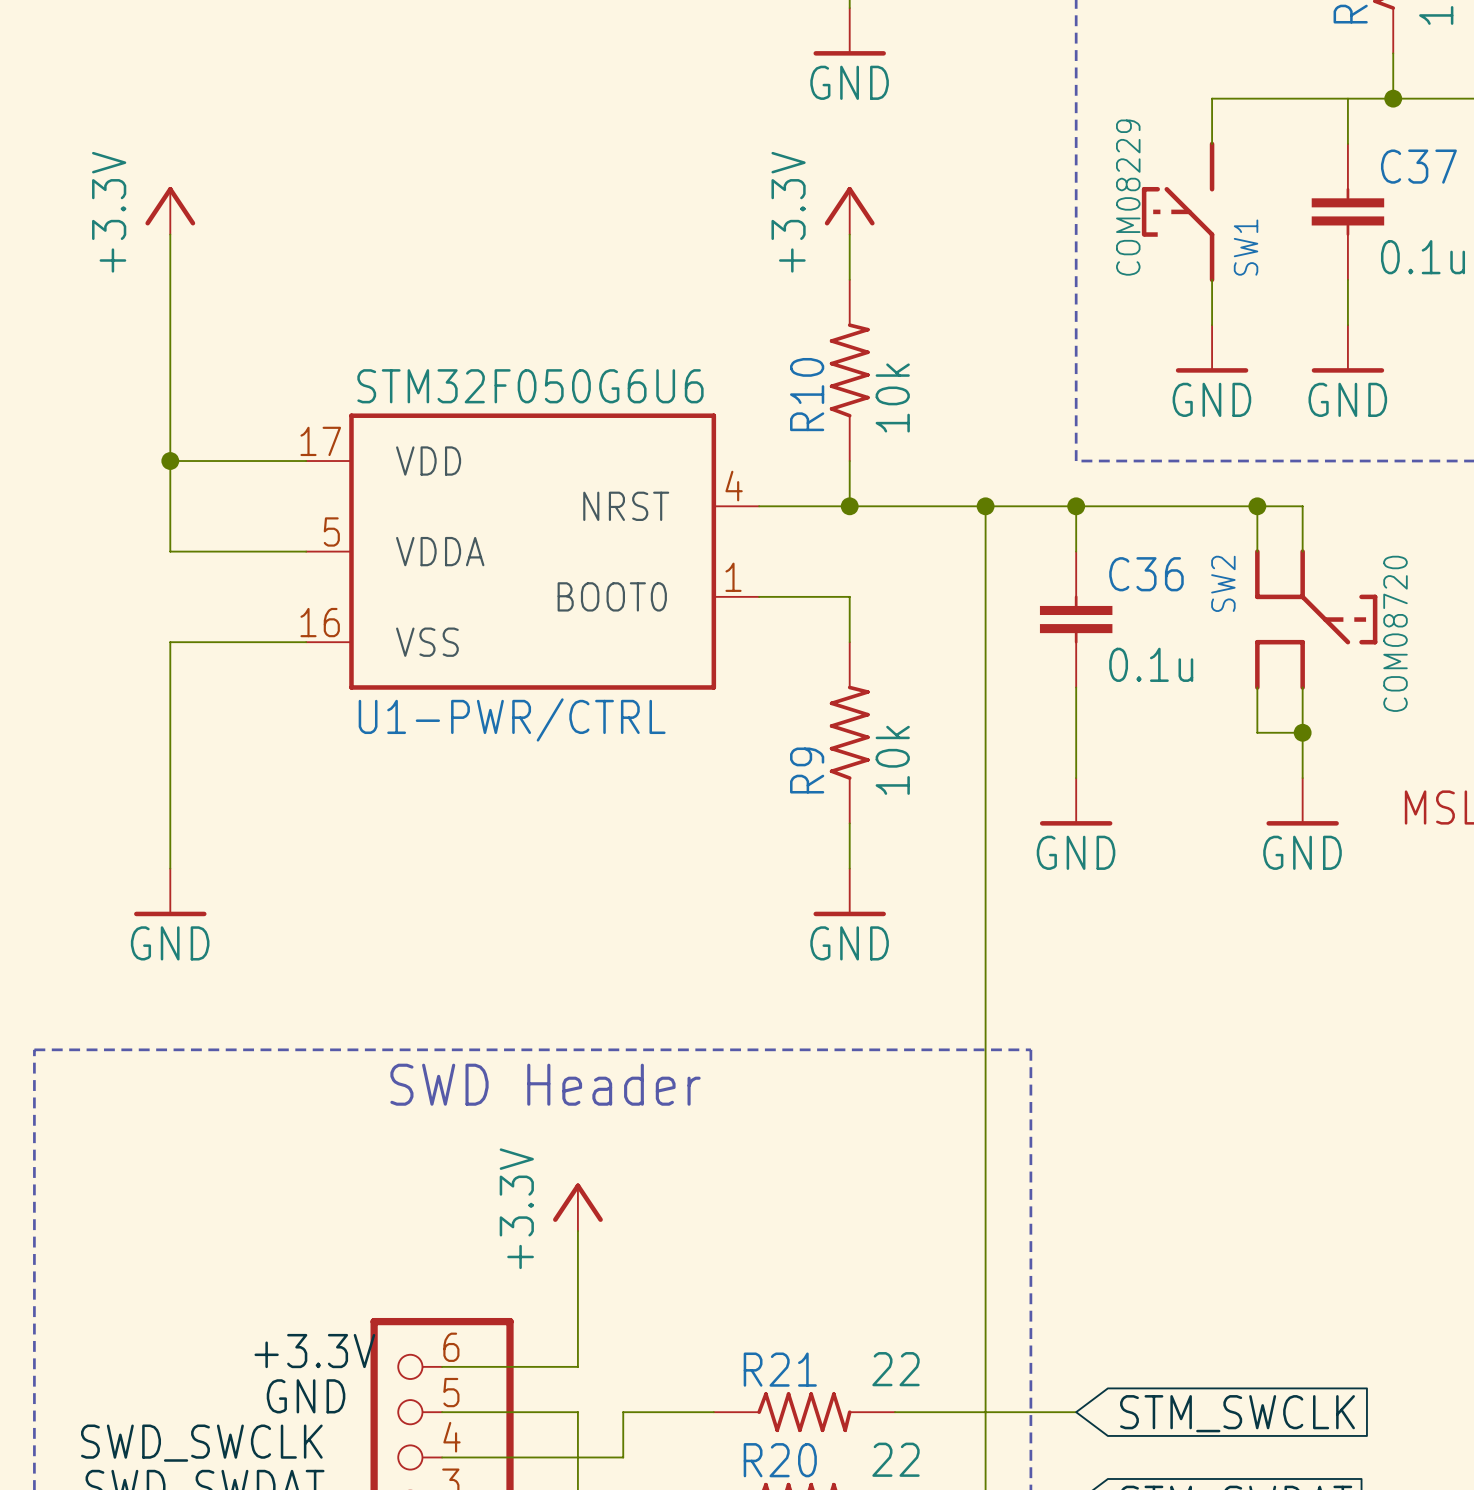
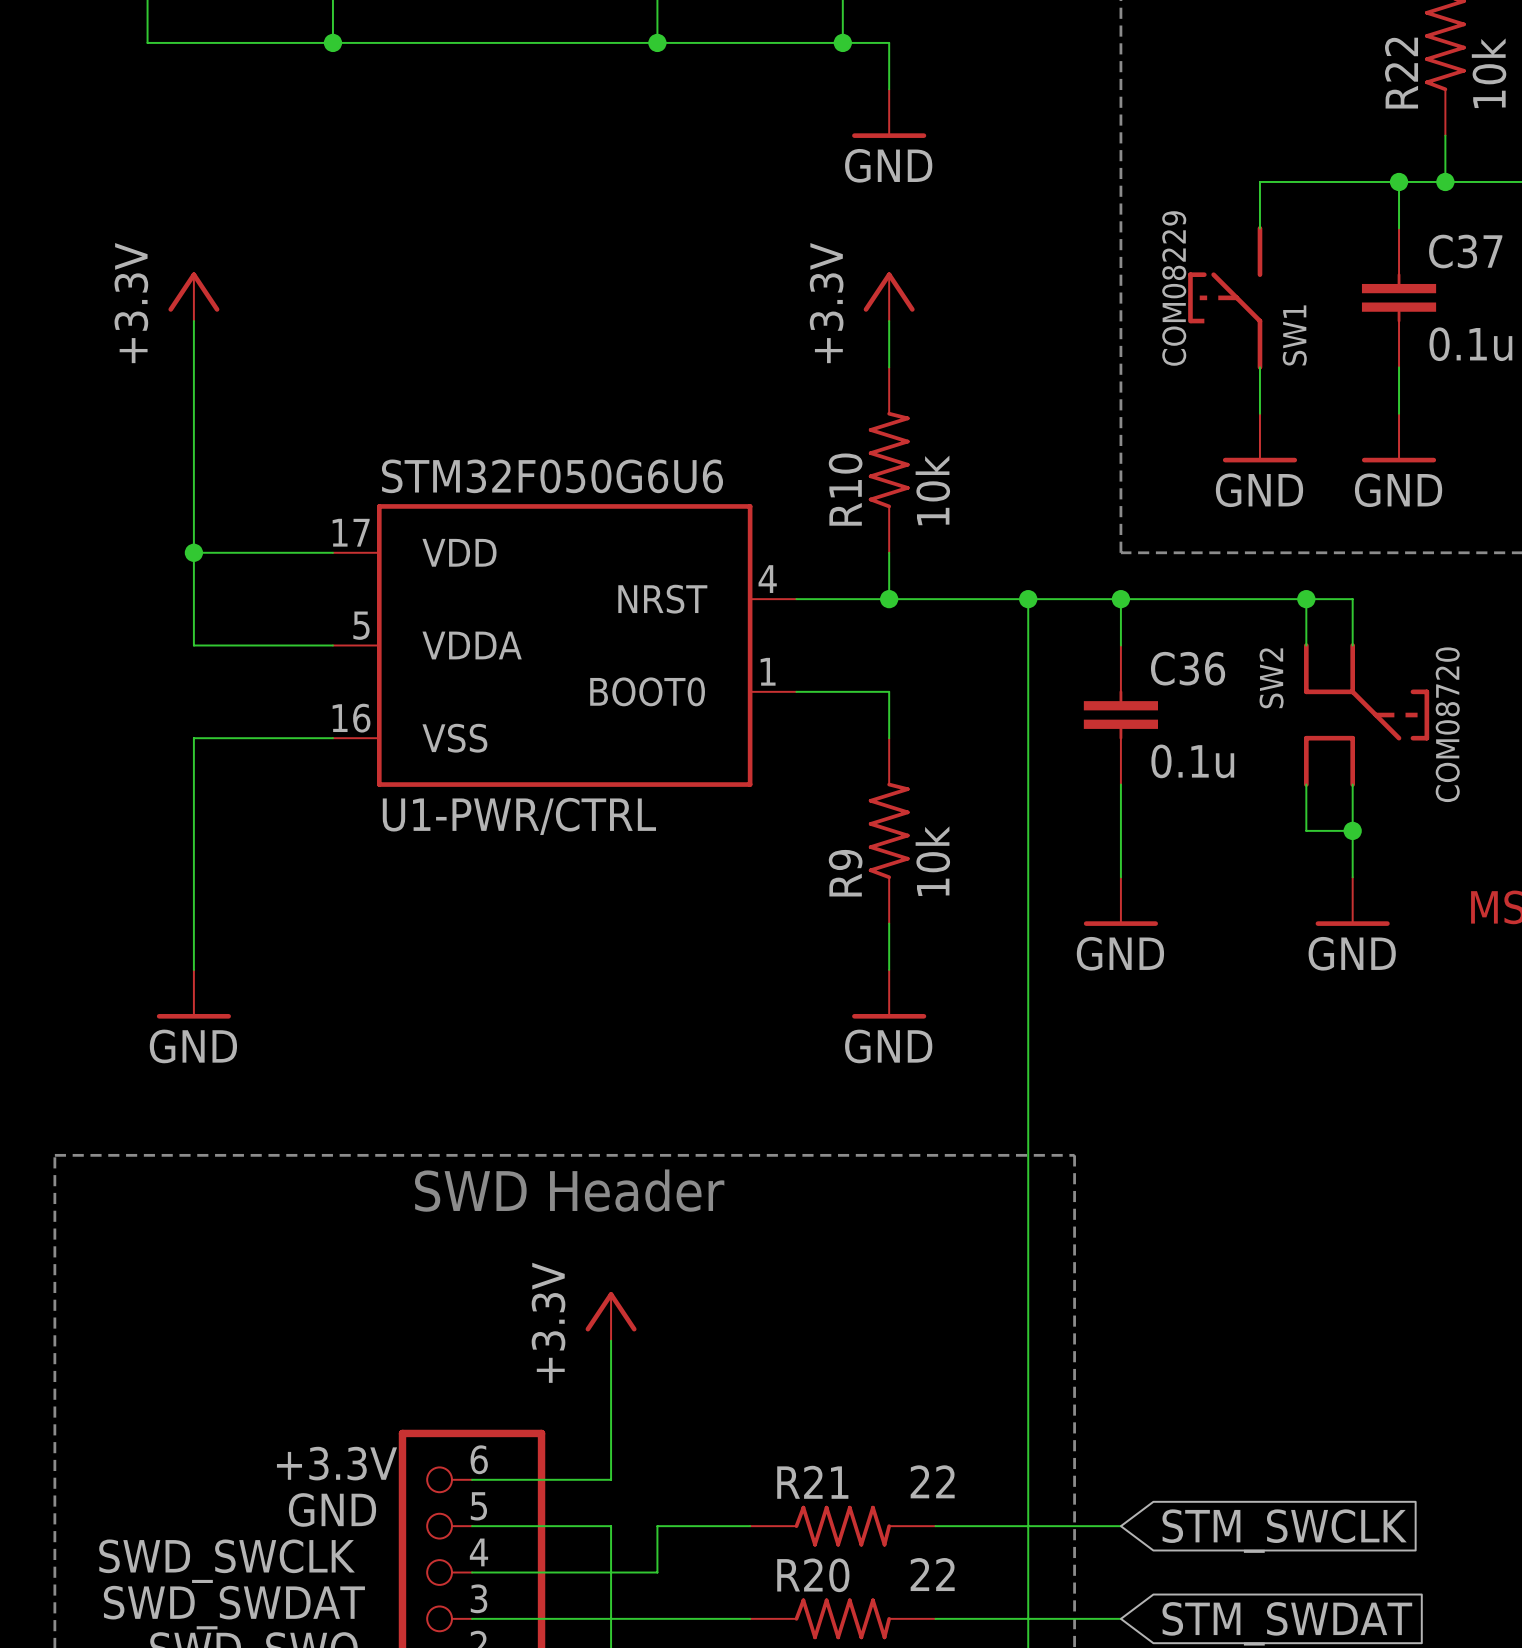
junction: none -> (1399, 181)

